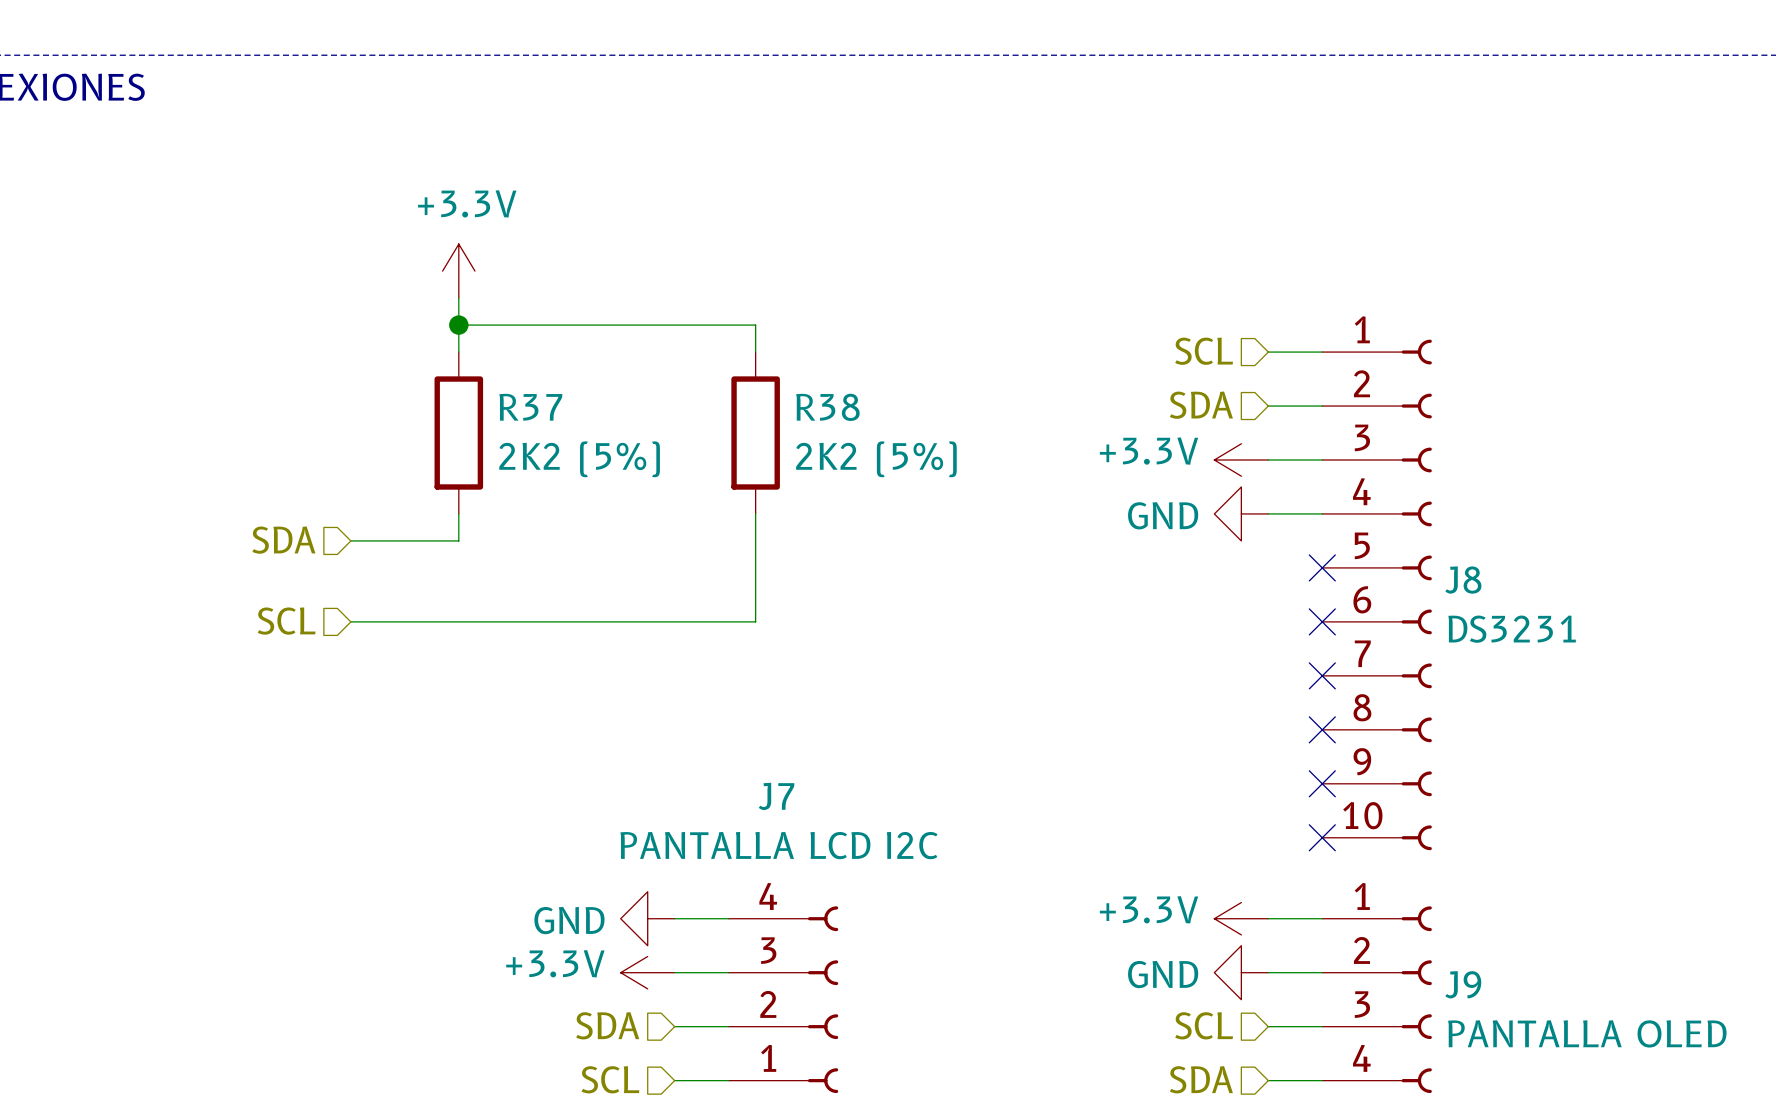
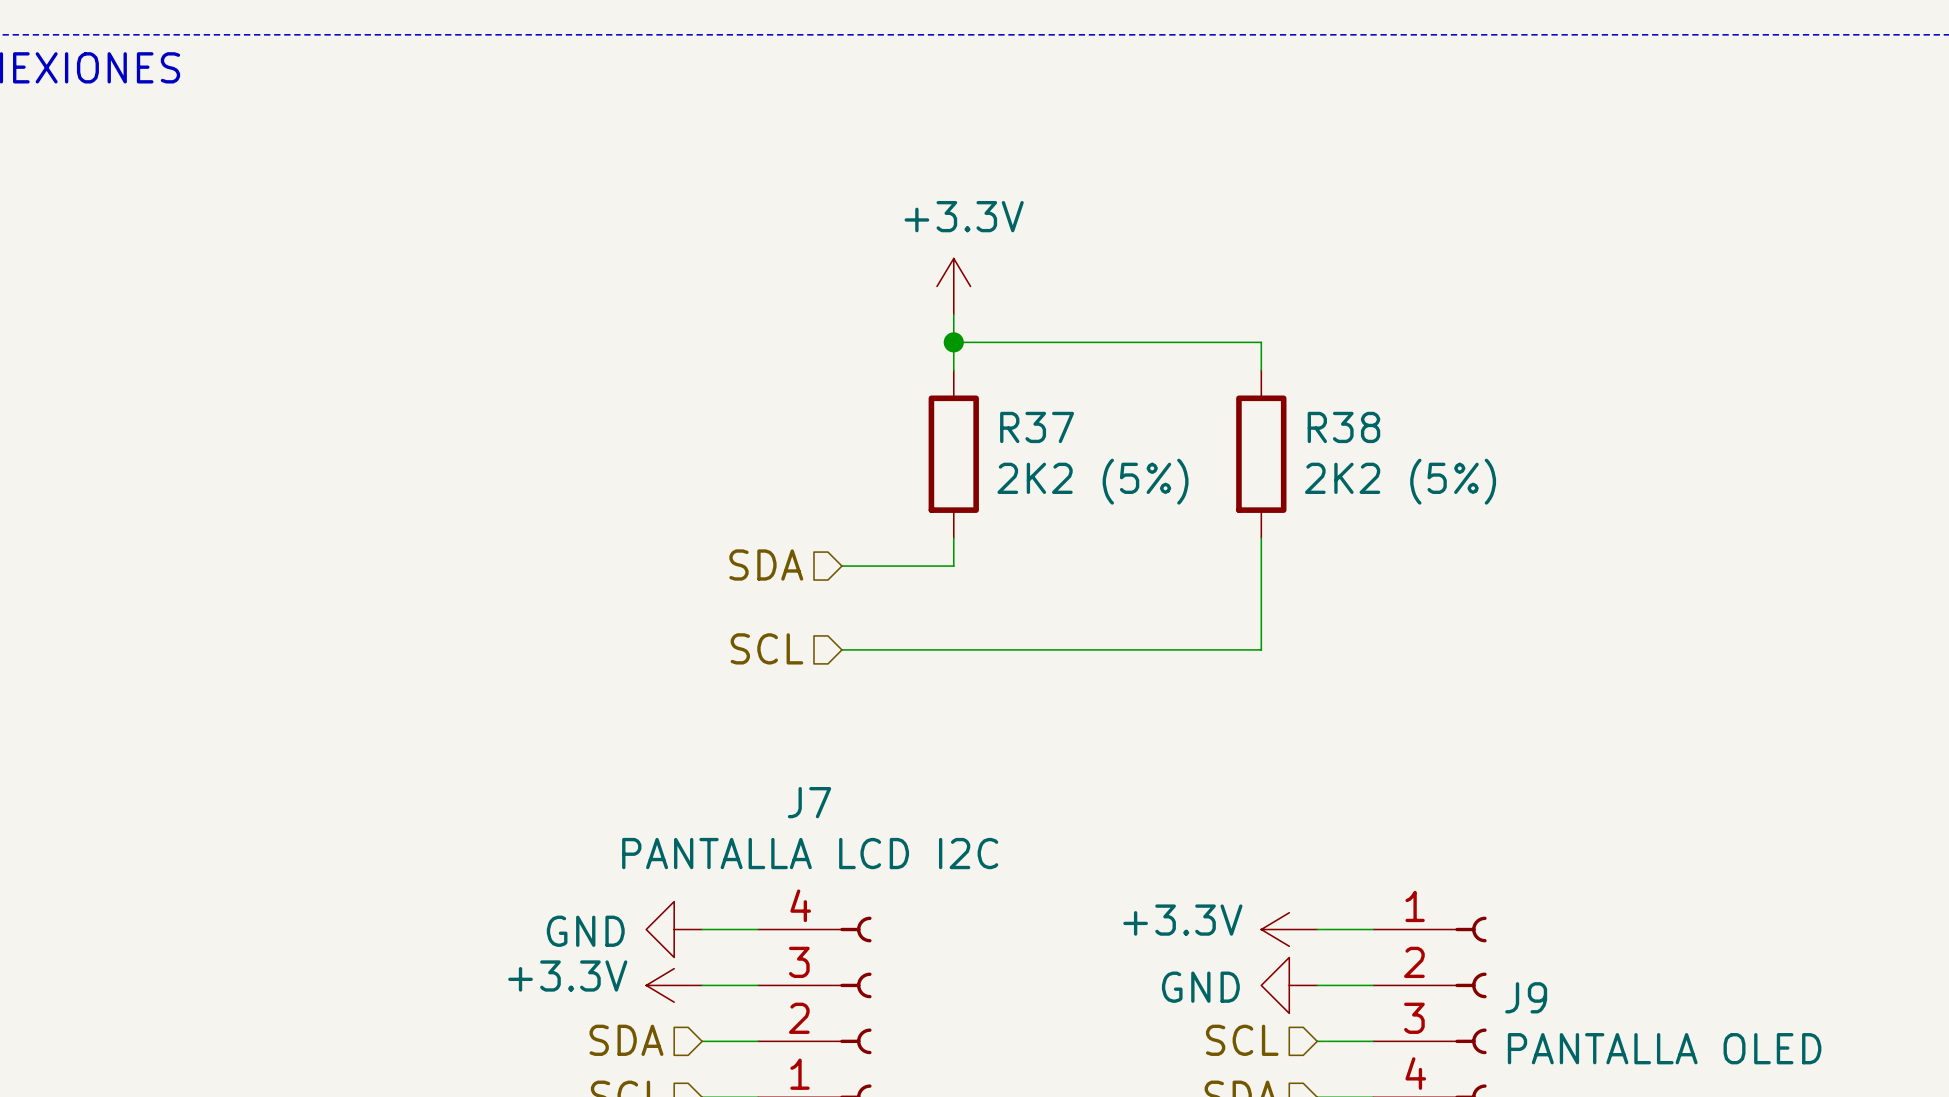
power symbol: +3.3V (458, 271) -> none
wire: (458, 298) (458, 352) -> (953, 314) (953, 370)
power symbol: none -> +3.3V (953, 286)
wire: (458, 325) (755, 325) (755, 352) -> (953, 342) (1261, 342) (1261, 370)
junction: (458, 325) -> none
hierarchical label: SCL (1204, 351) -> none
junction: none -> (953, 342)
wire: (1268, 352) (1322, 352) -> none
hierarchical label: SDA (1201, 405) -> none
wire: (1268, 406) (1322, 406) -> none
R37 position: (458, 433) -> (953, 454)
R38 position: (755, 433) -> (1261, 454)
power symbol: +3.3V (1241, 459) -> none
wire: (1268, 459) (1322, 459) -> none
wire: (458, 513) (458, 540) (350, 540) -> (953, 538) (953, 566) (841, 566)
wire: (755, 513) (755, 621) (350, 621) -> (1261, 538) (1261, 649) (841, 649)
power symbol: GND (1241, 513) -> none
wire: (1268, 513) (1322, 513) -> none
hierarchical label: SDA (283, 540) -> none
hierarchical label: none -> SDA (766, 565)
no-connect mark: (1322, 567) -> none
J8: DS3231 (1377, 594) -> none
hierarchical label: SCL (286, 621) -> none
no-connect mark: (1322, 621) -> none
hierarchical label: none -> SCL (766, 648)
no-connect mark: (1322, 675) -> none
no-connect mark: (1322, 729) -> none
no-connect mark: (1322, 783) -> none
no-connect mark: (1322, 837) -> none

